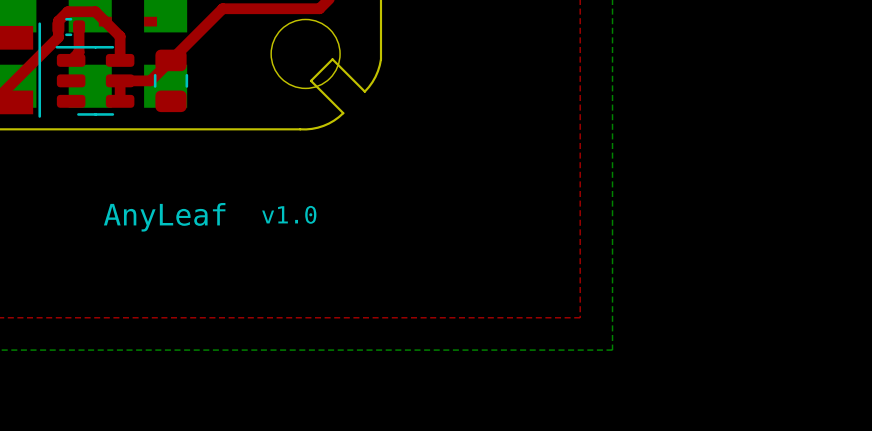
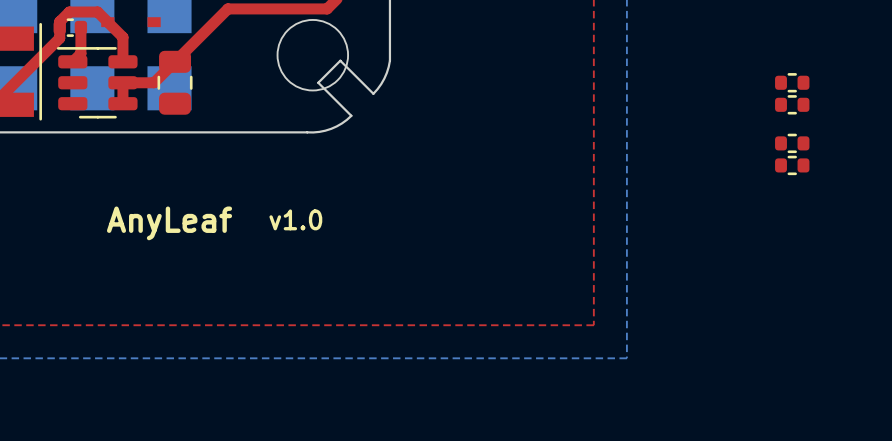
part: none -> (792, 82)
part: none -> (792, 104)
part: none -> (792, 143)
part: none -> (792, 165)

